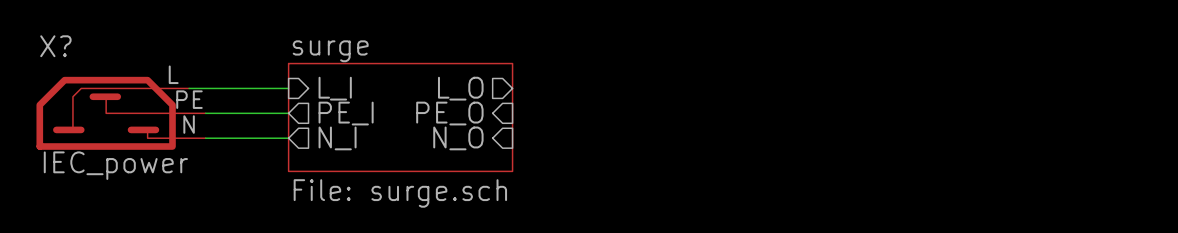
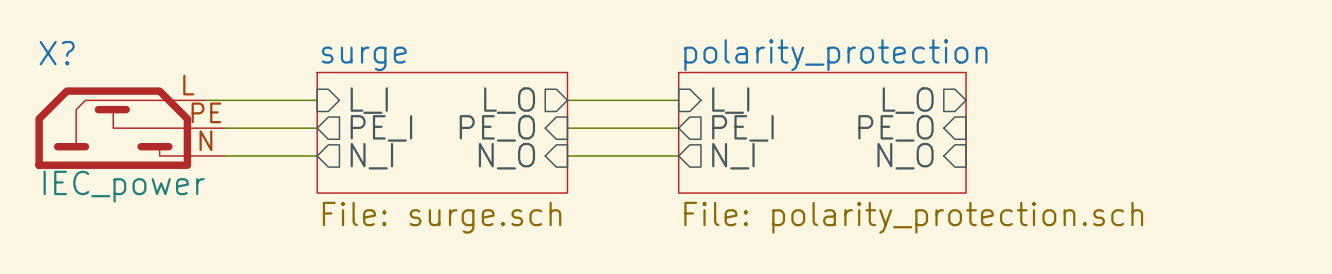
wire: none -> (567, 100) (678, 100)
sheet pin: none -> L_I (730, 100)
sheet pin: none -> L_O (908, 100)
wire: none -> (567, 128) (678, 128)
sheet pin: none -> PE_I (742, 128)
sheet pin: none -> PE_O (895, 128)
sheet polarity_protection: none -> File: polarity_protection.sch (822, 132)
wire: none -> (567, 155) (678, 155)
sheet pin: none -> N_I (733, 156)
sheet pin: none -> N_O (905, 156)

